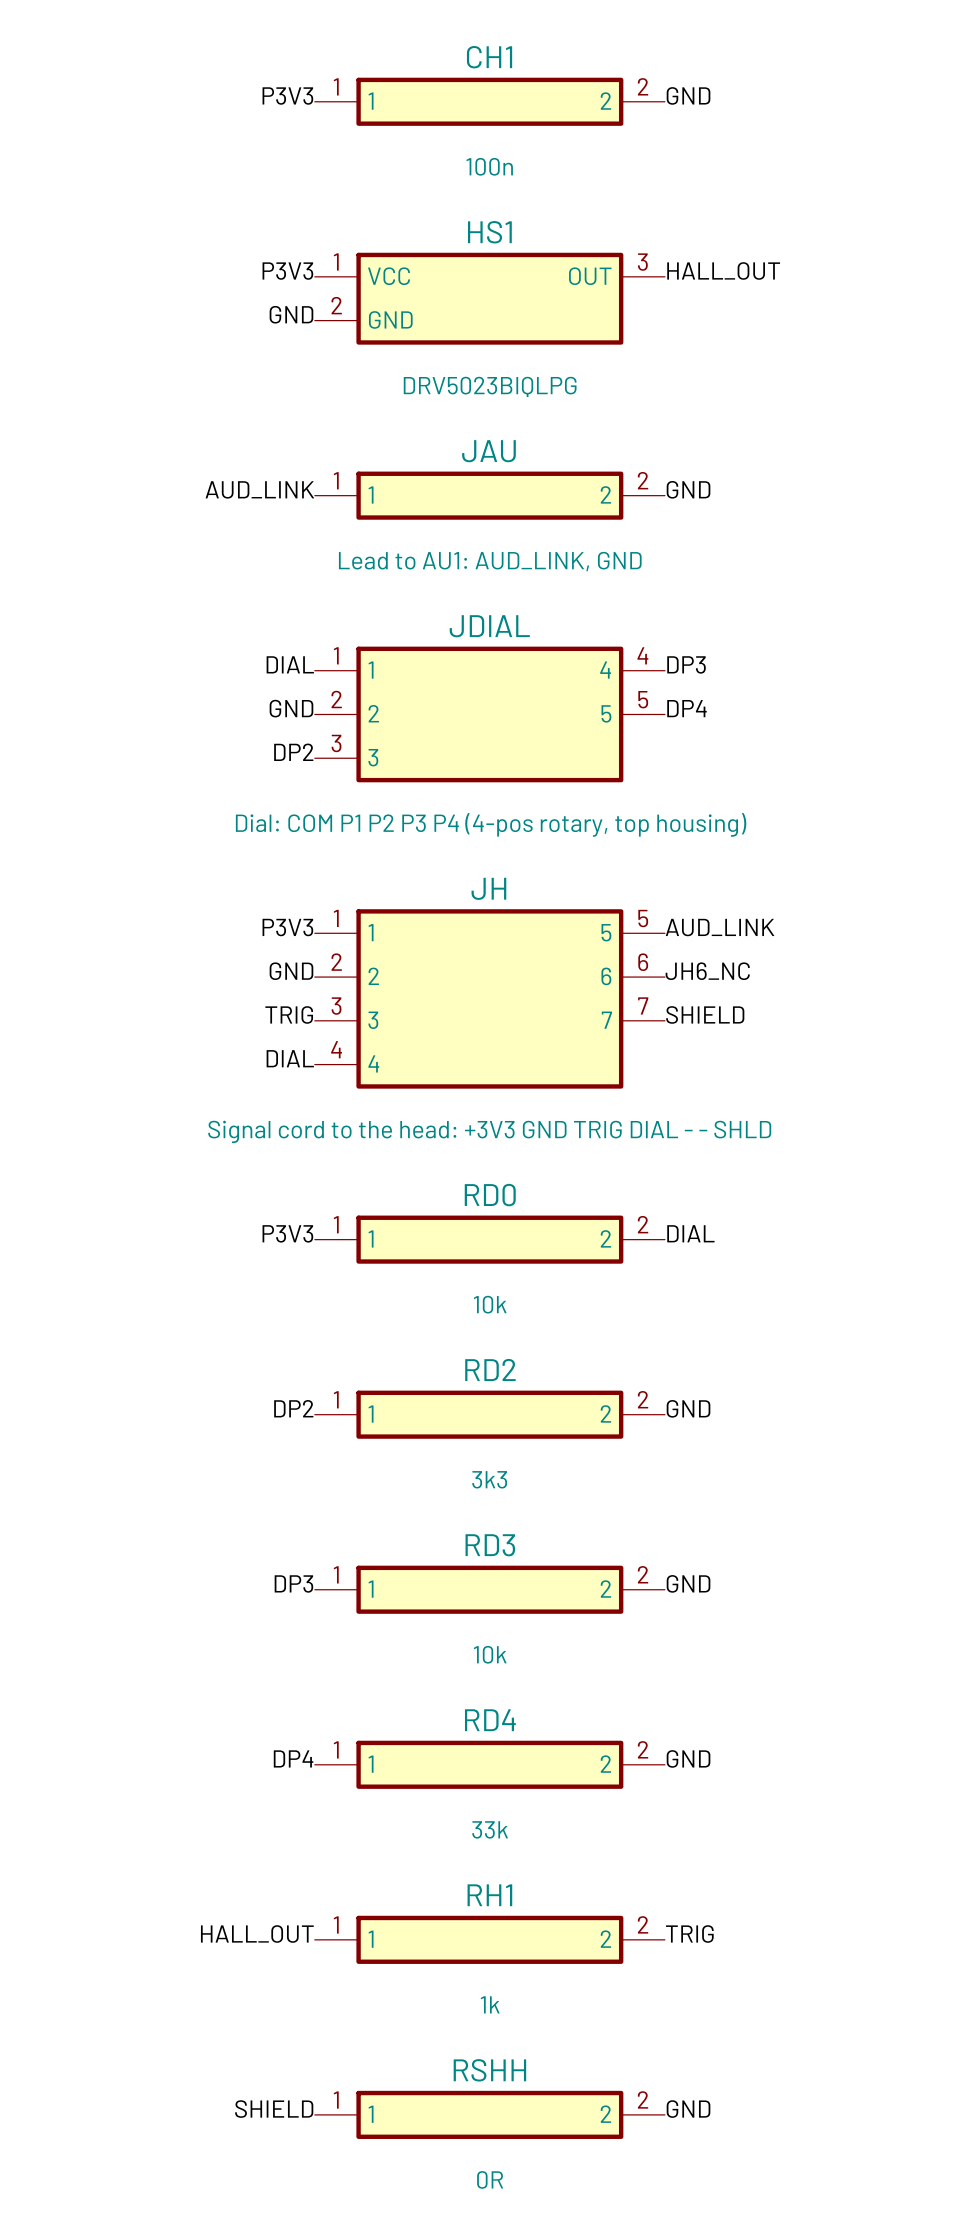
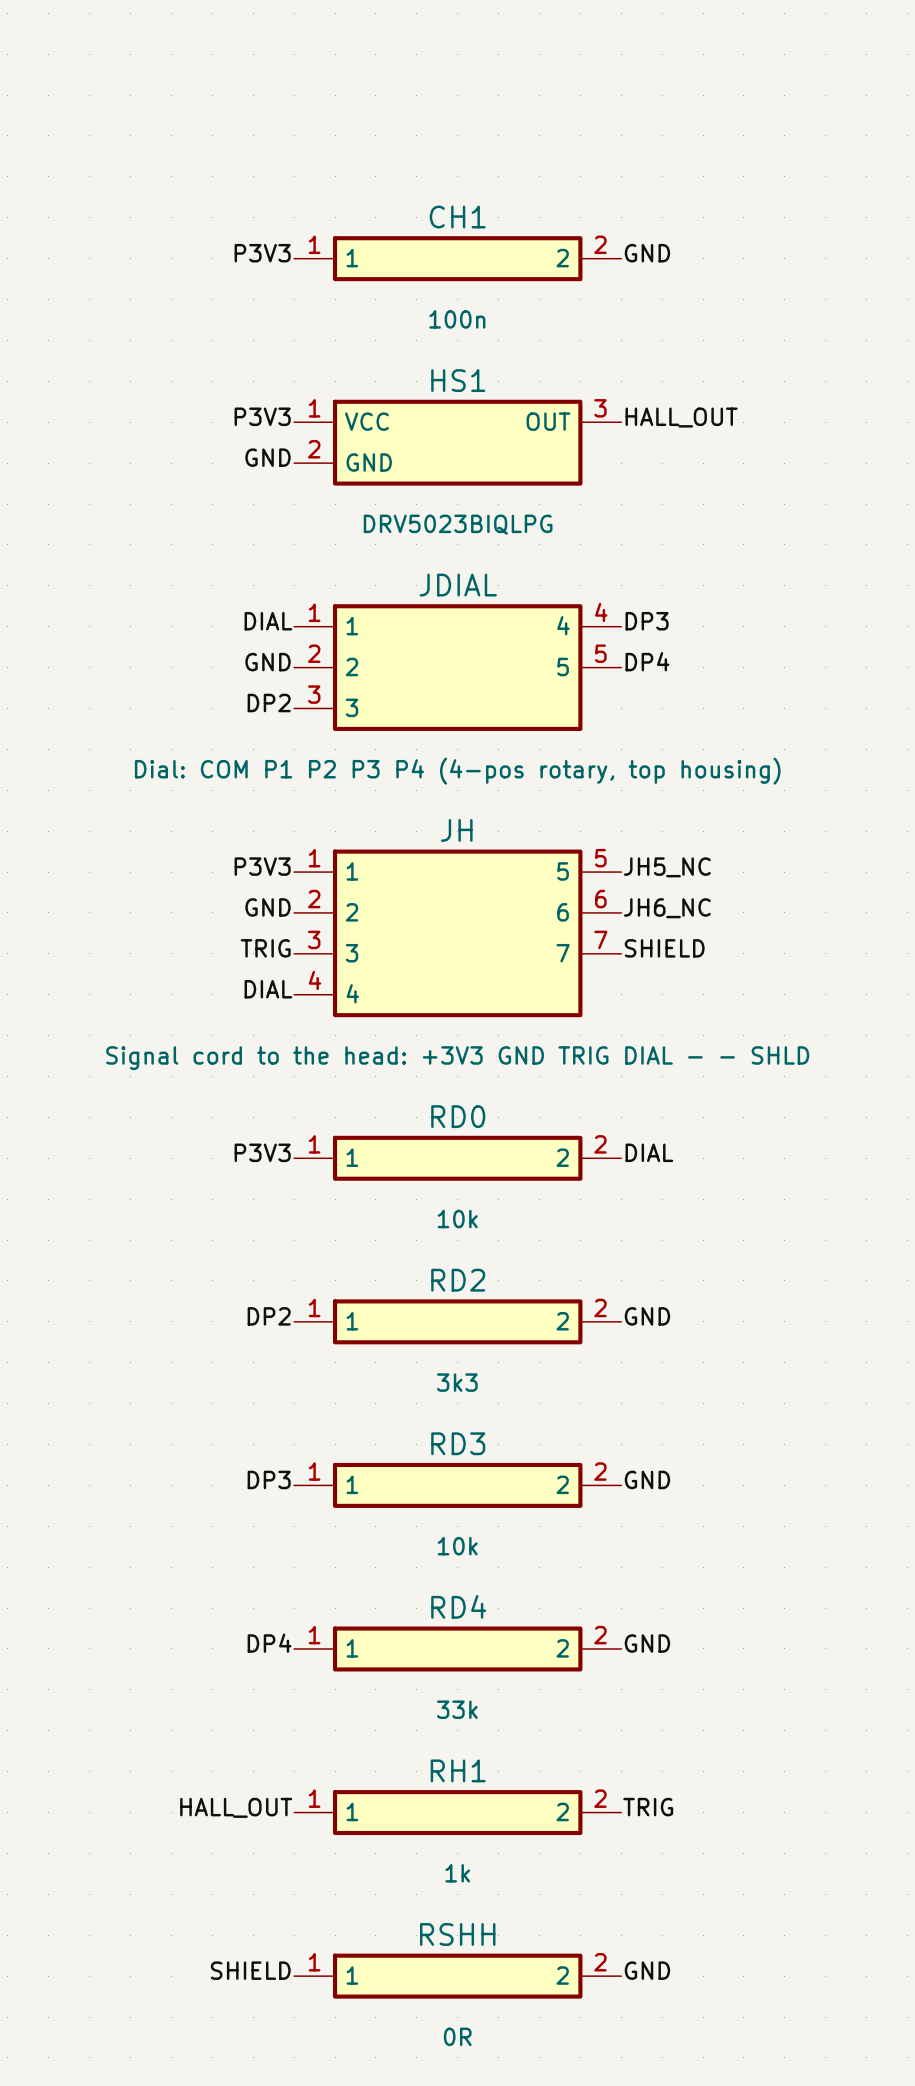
label: GND (688, 95) -> none
label position: P3V3 (287, 96) -> P3V3 (262, 416)
CH1 position: (489, 101) -> (457, 258)
label: HALL_OUT (723, 270) -> GND (647, 253)
HS1 position: (489, 298) -> (457, 442)
label: GND (291, 314) -> none
label: none -> HALL_OUT (681, 417)
label: AUD_LINK (259, 489) -> GND (268, 457)
label: GND (688, 489) -> none
JAU: Lead to AU1: AUD_LINK, GND (489, 495) -> none
label: AUD_LINK (720, 927) -> JH5_NC (667, 867)

